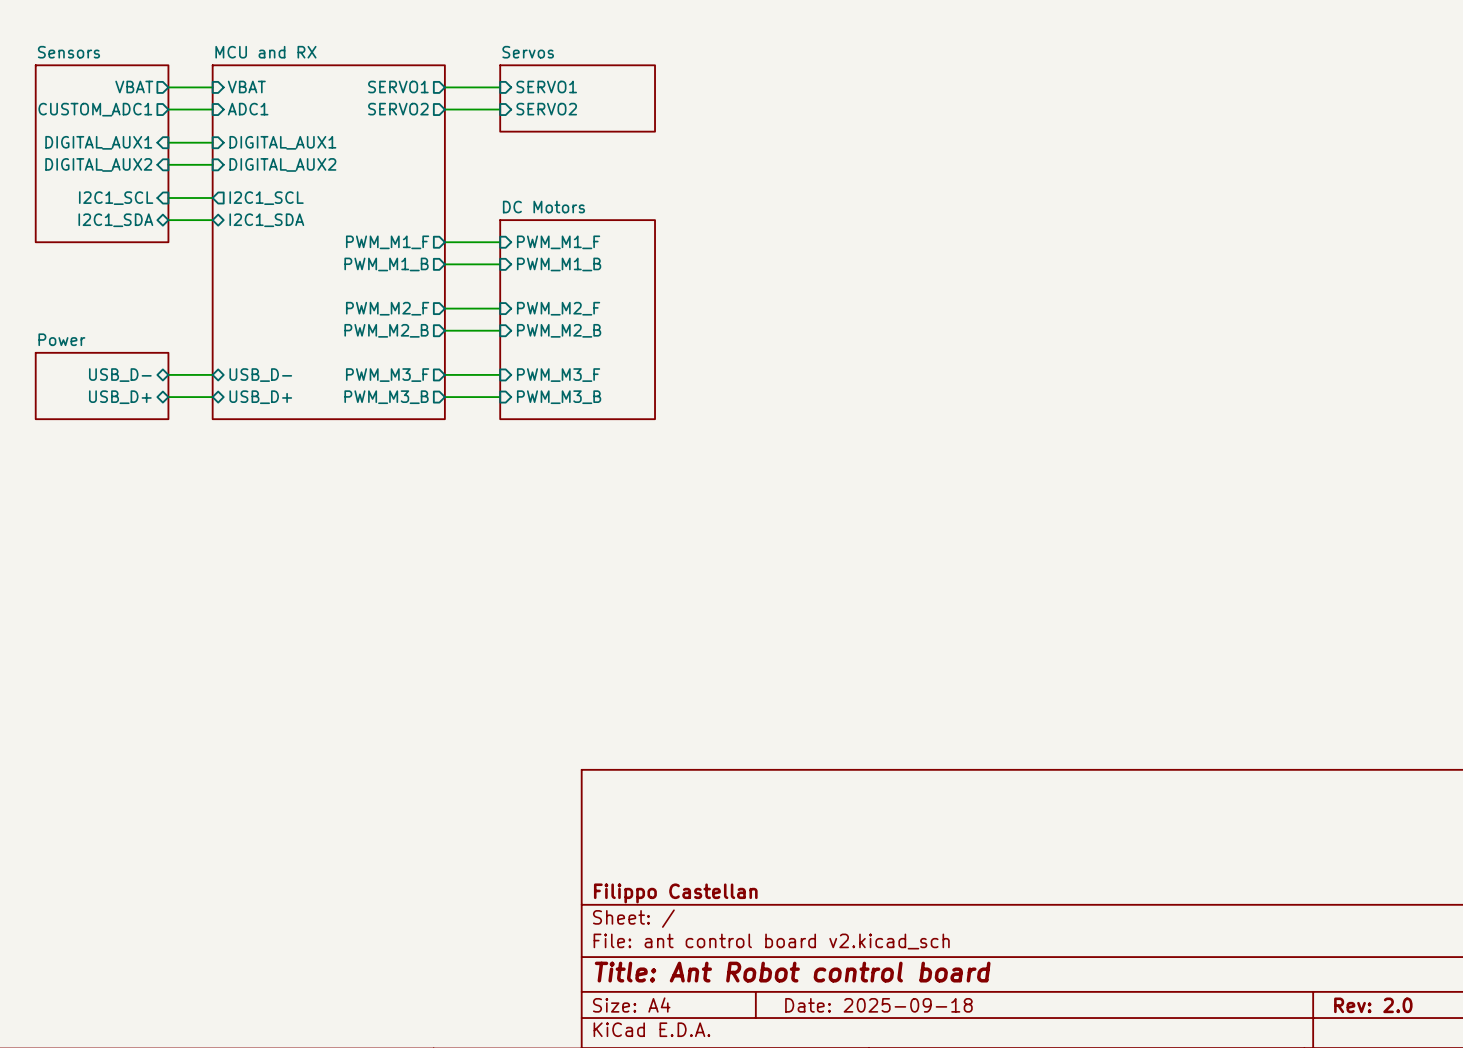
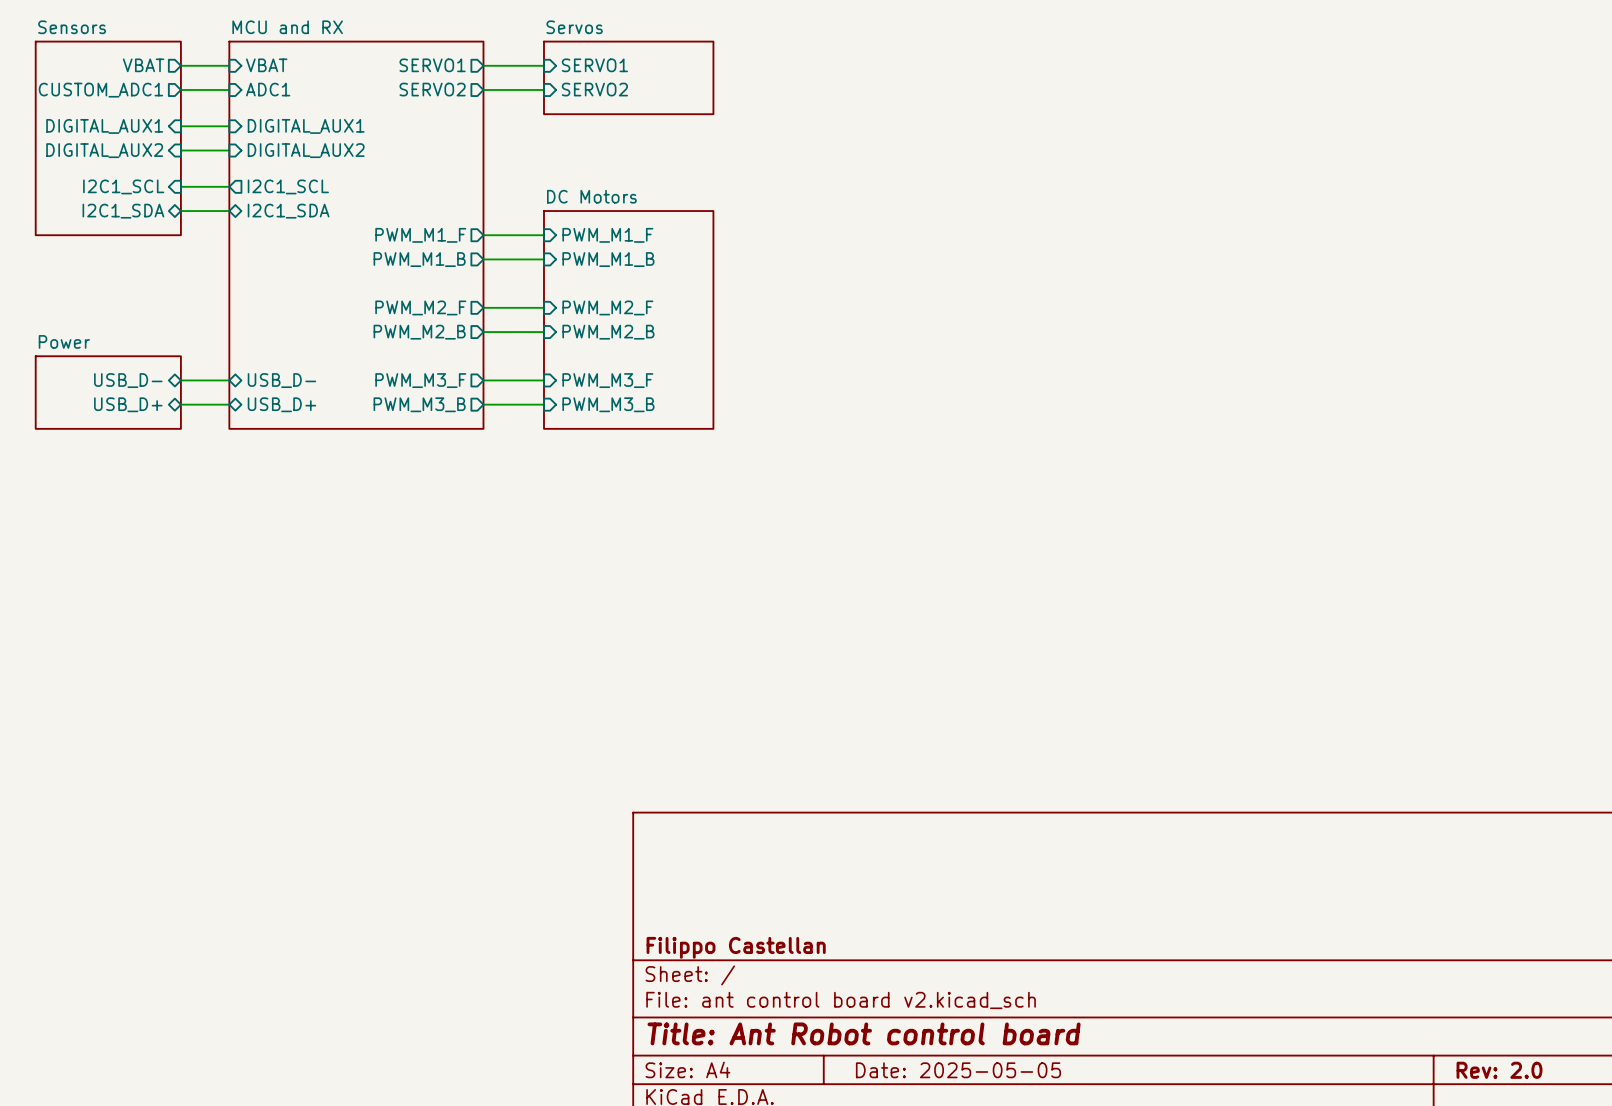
title block: Date: 2025-09-18 (878, 1005) -> Date: 2025-05-05 (958, 1070)

